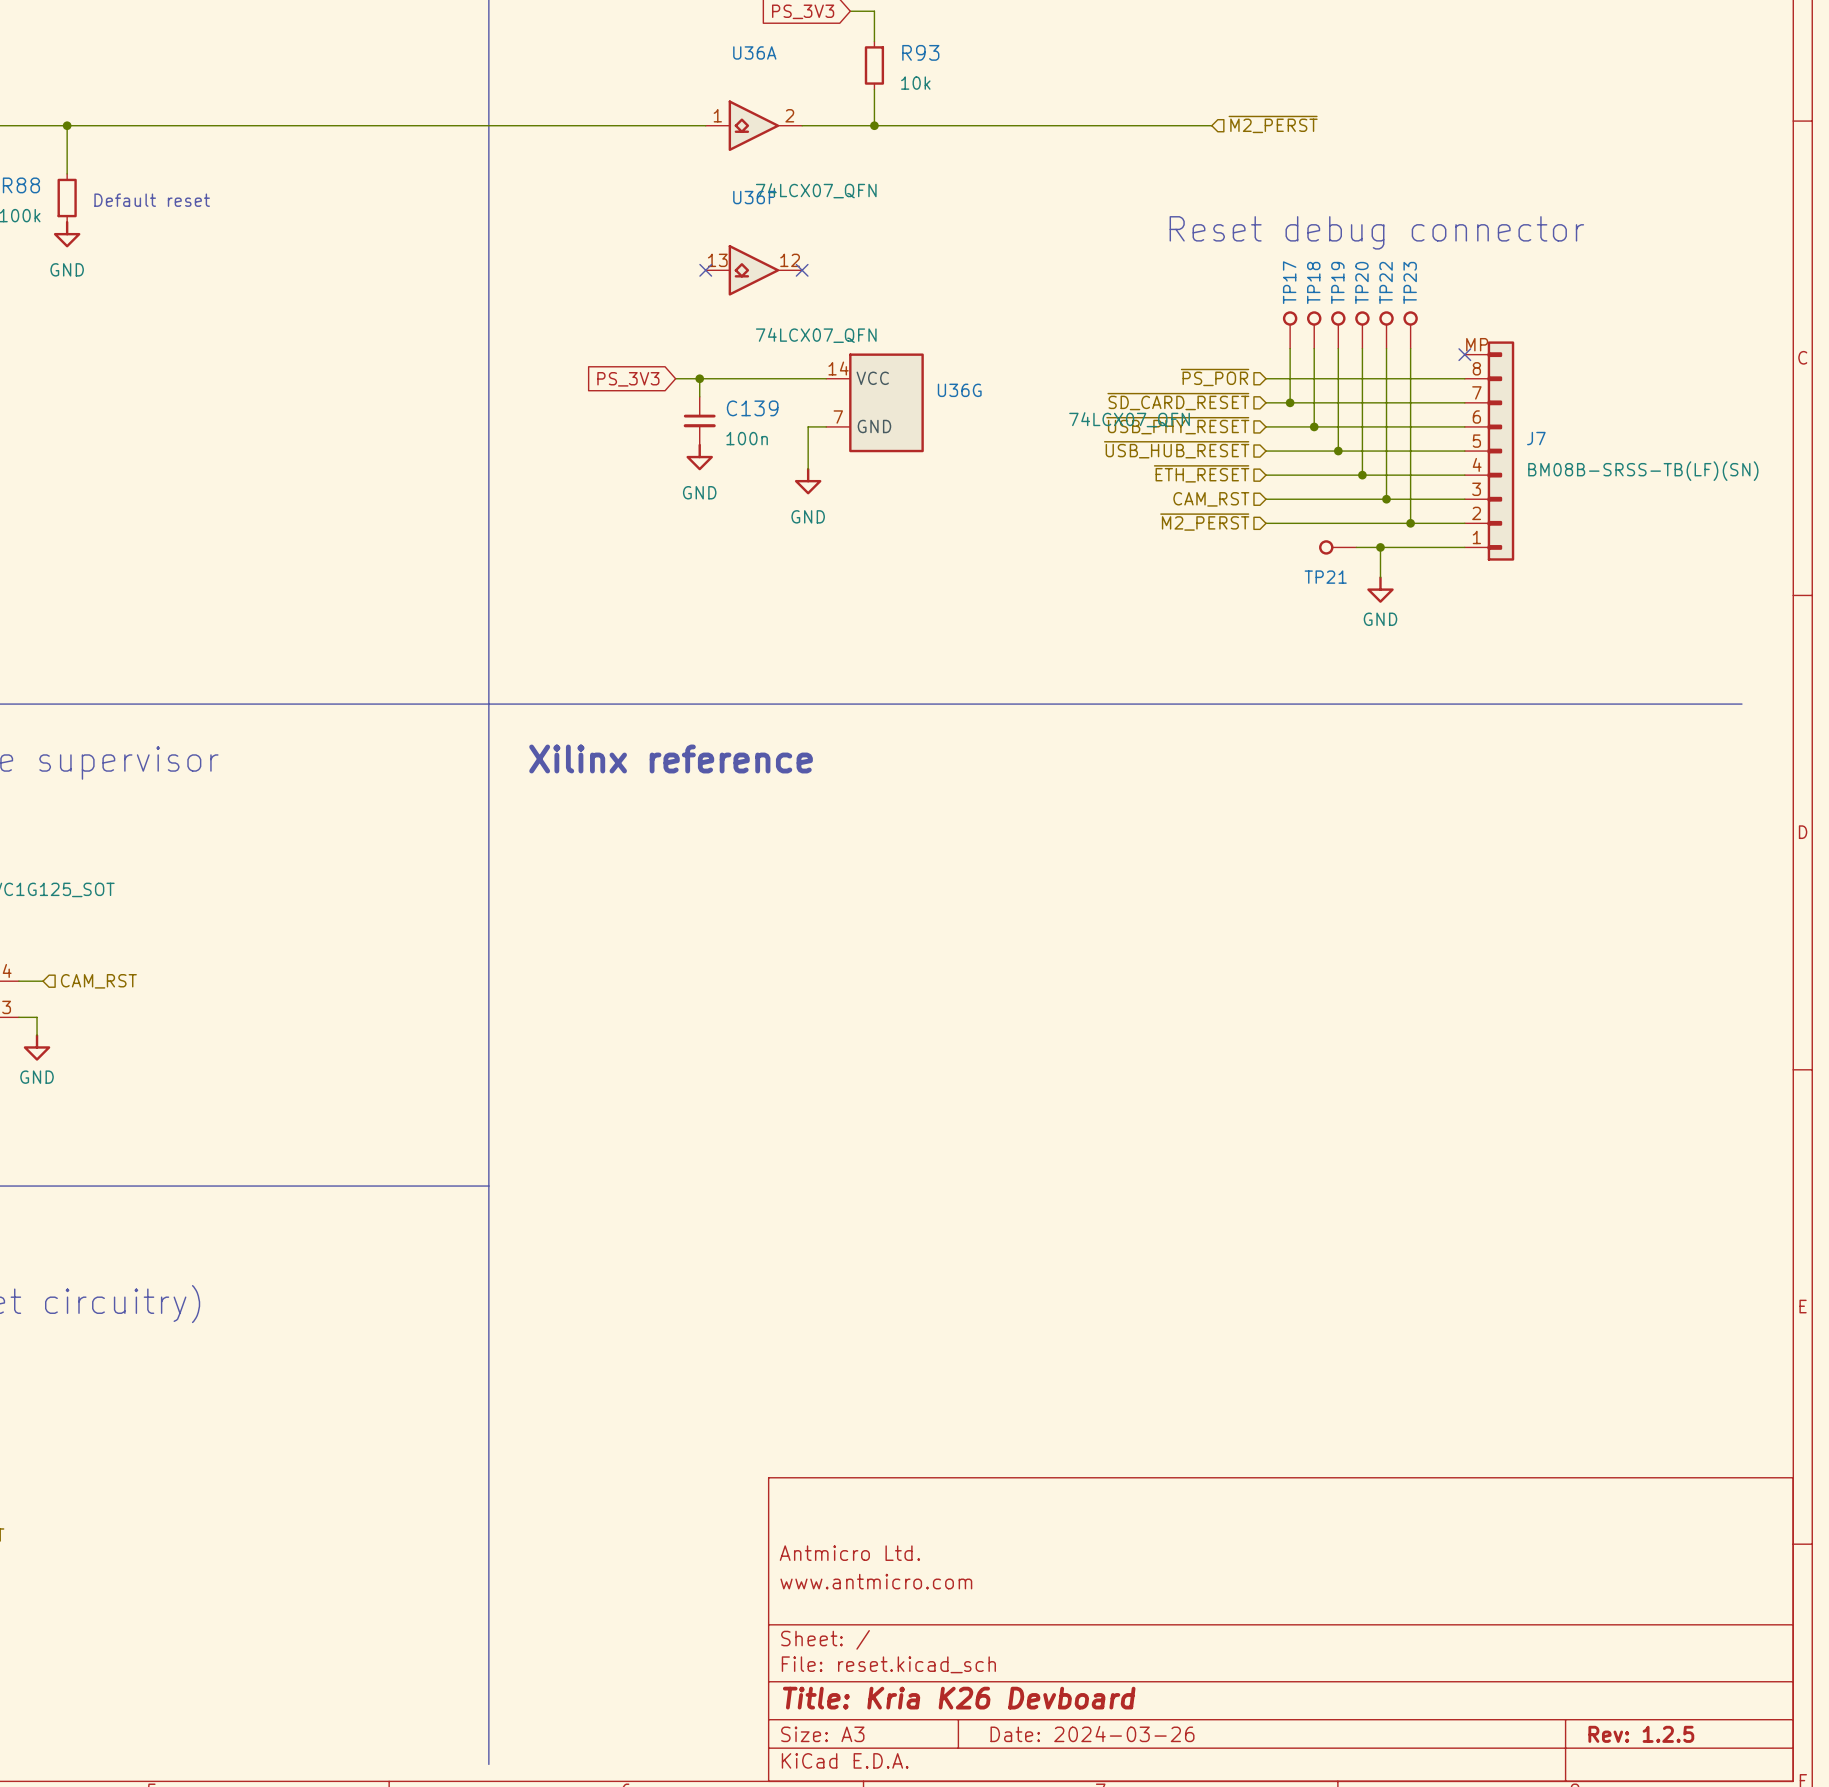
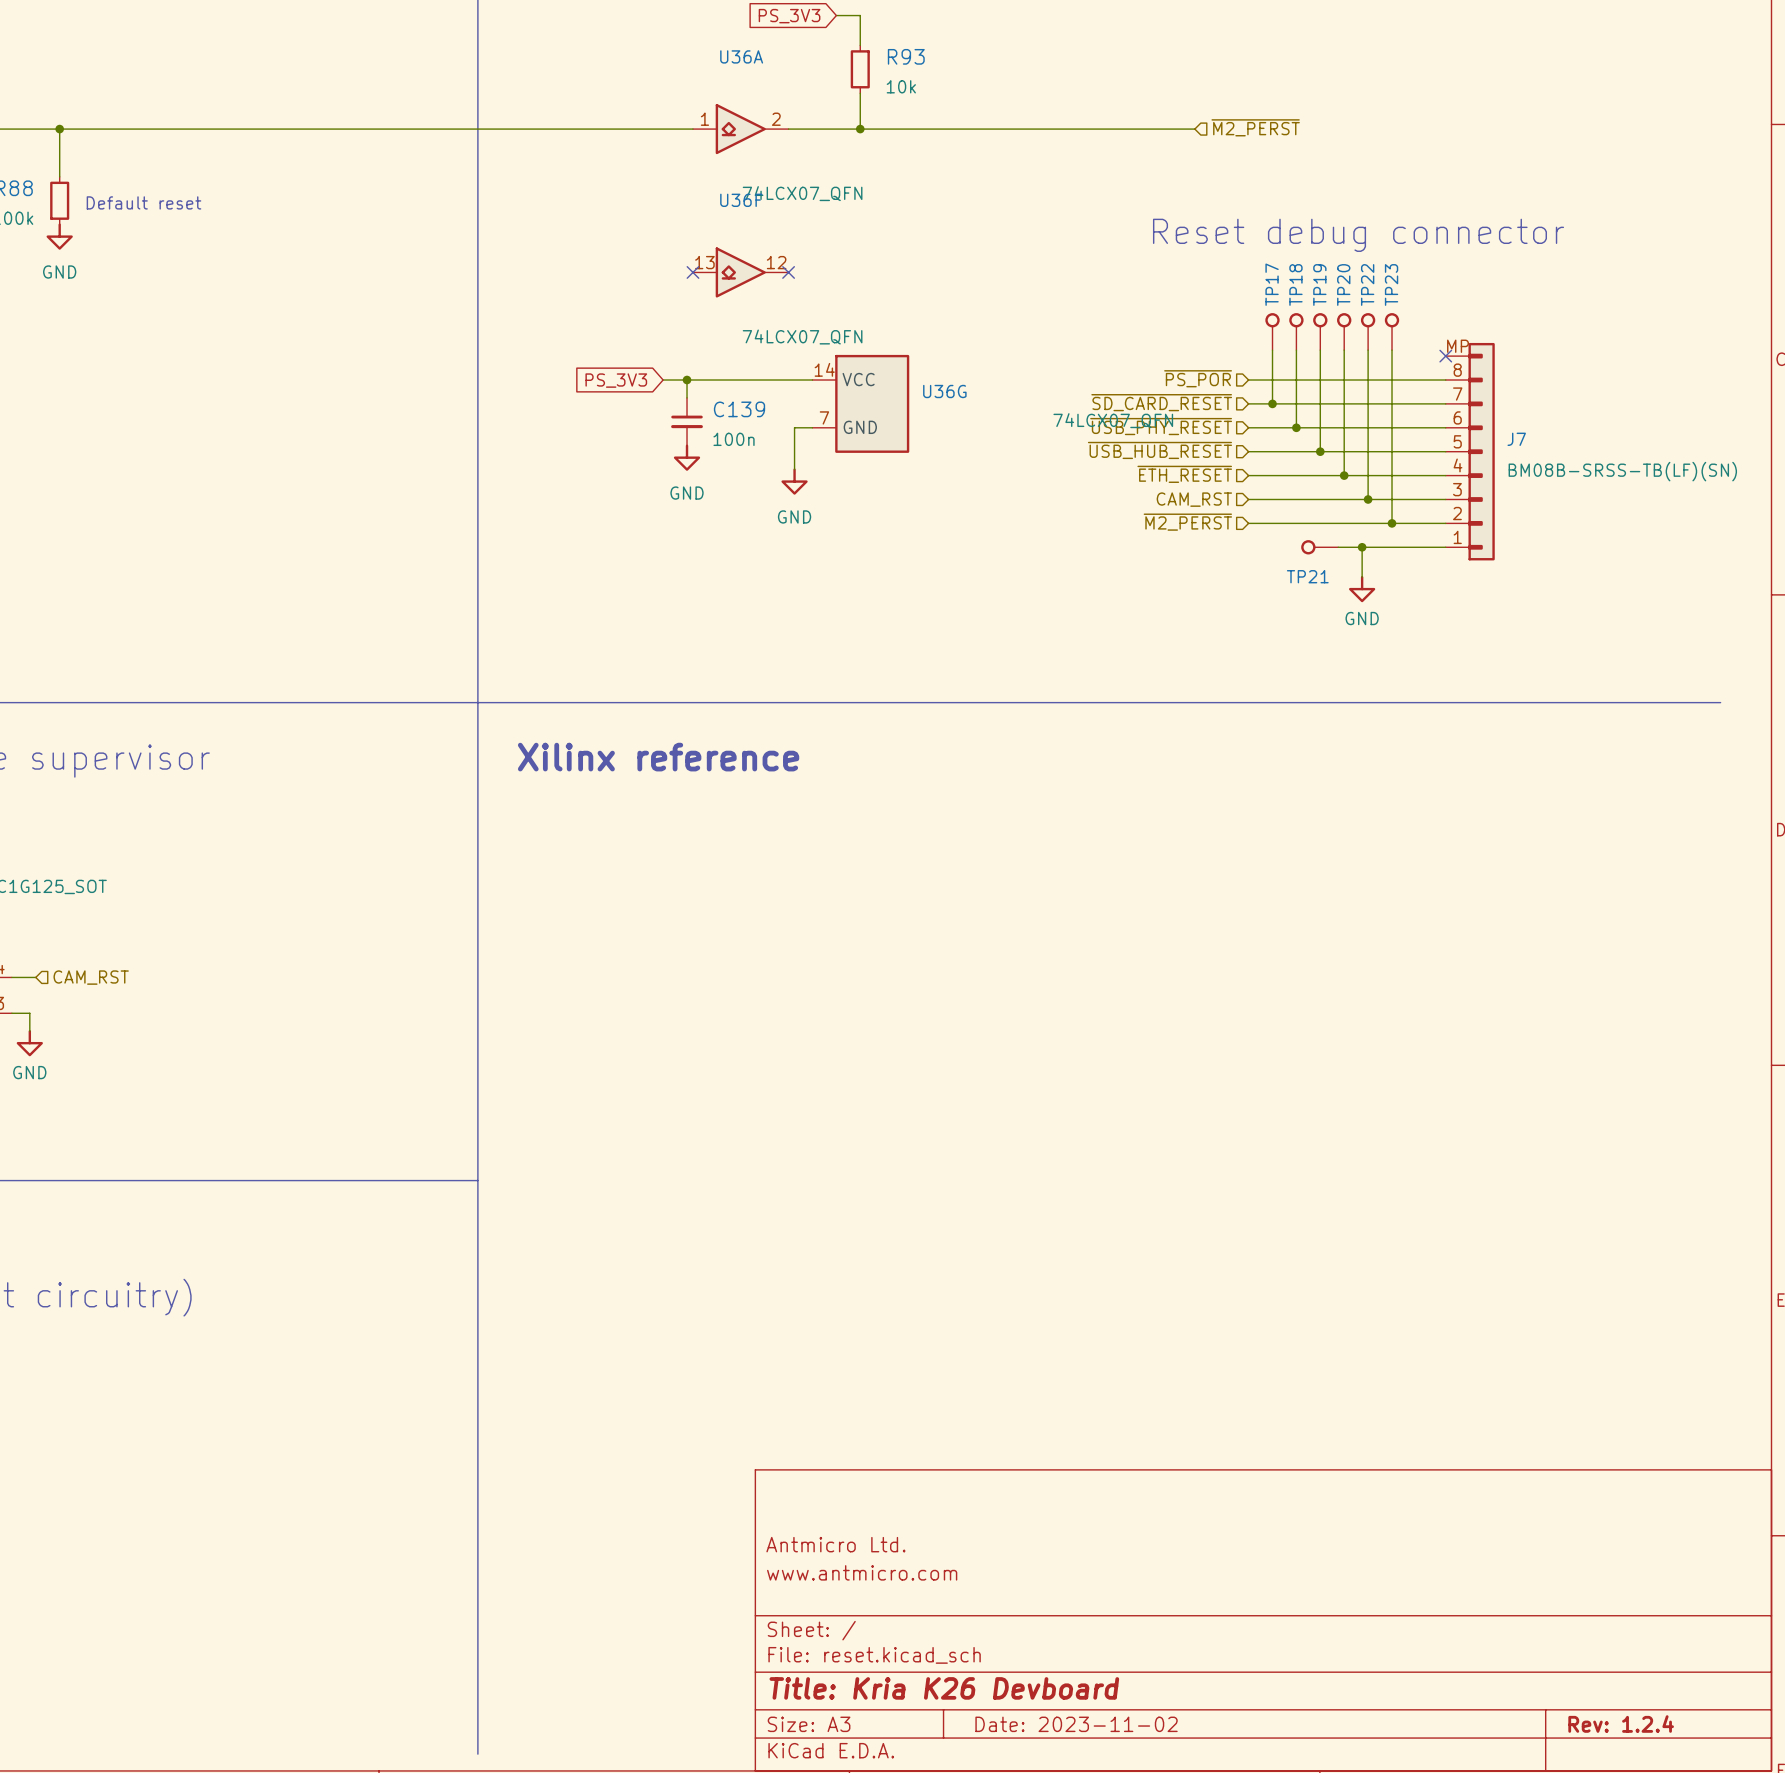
title block: Date: 2024-03-26 (1092, 1734) -> Date: 2023-11-02 (1076, 1724)
title block: Rev: 1.2.5 (1641, 1734) -> Rev: 1.2.4 (1621, 1724)

